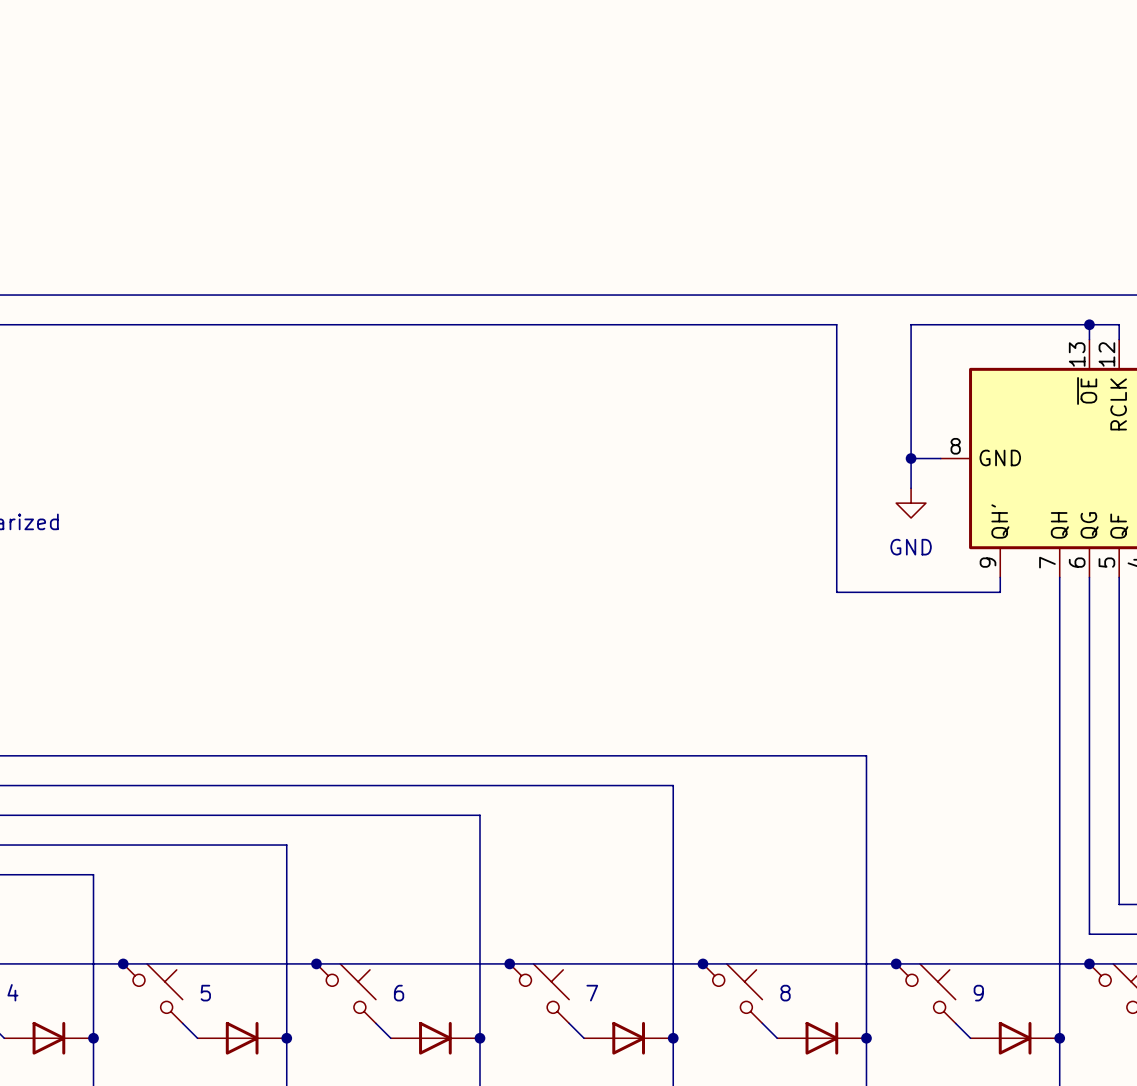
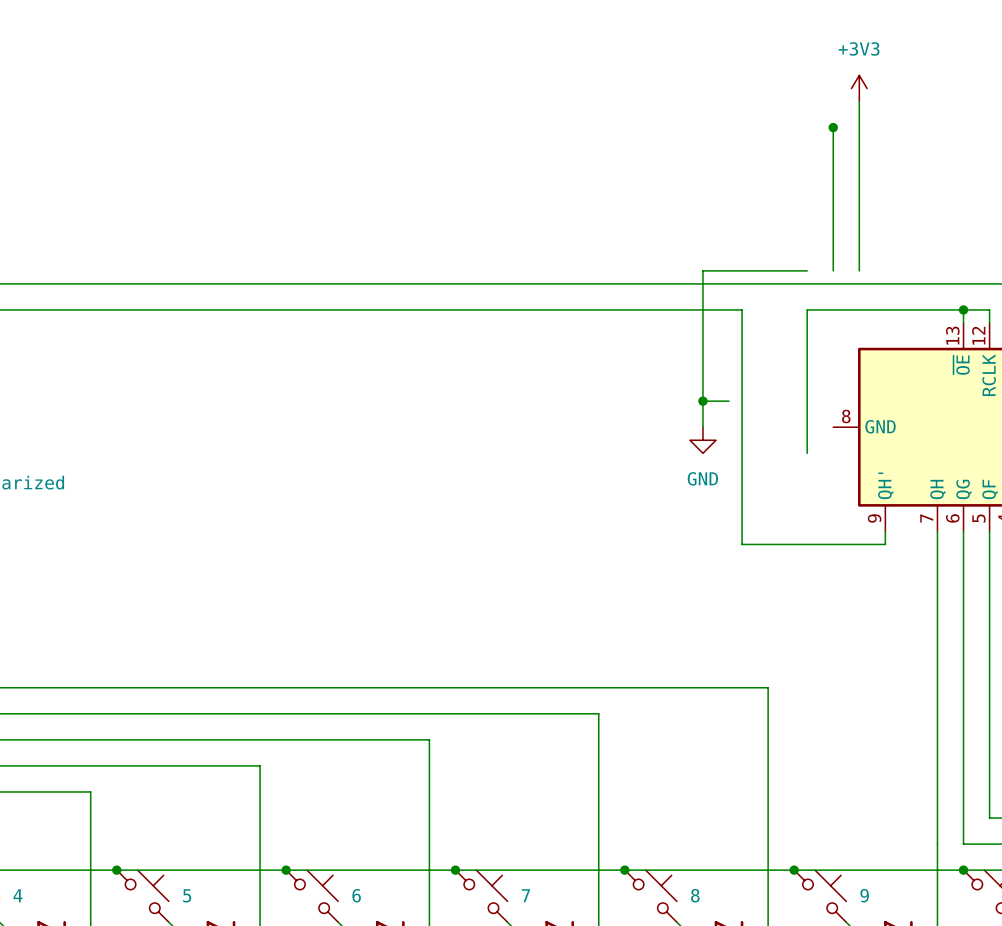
power symbol: none -> +3V3 (859, 88)
wire: none -> (859, 101) (859, 270)
wire: none -> (833, 127) (833, 270)
junction: none -> (833, 127)
wire: none -> (807, 270) (702, 270) (702, 427)
junction: none -> (702, 401)
wire: (911, 458) (940, 458) -> (702, 401) (729, 401)
junction: (911, 458) -> none
power symbol position: GND (911, 503) -> GND (702, 440)

